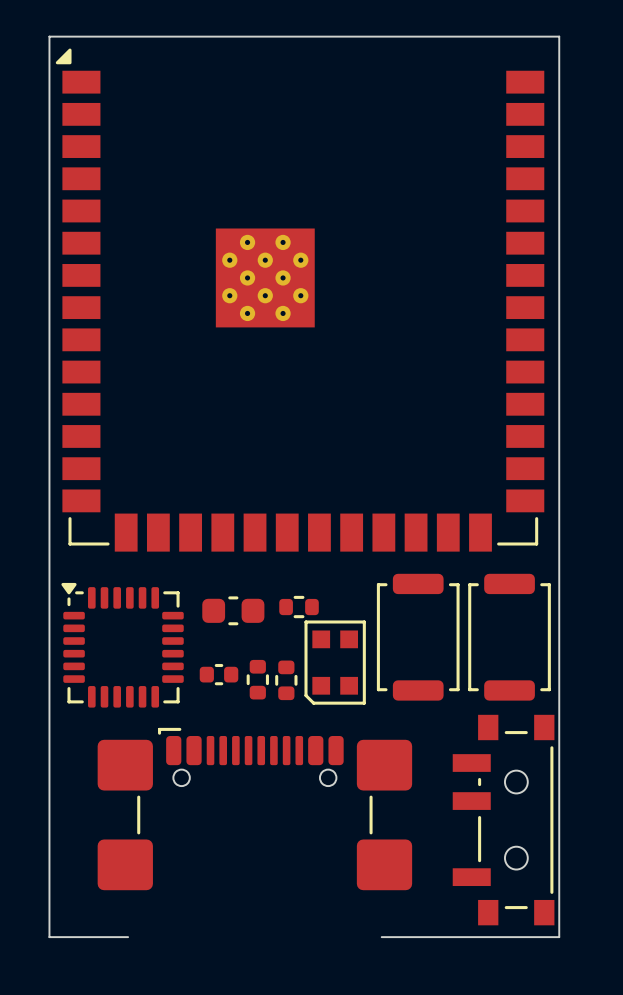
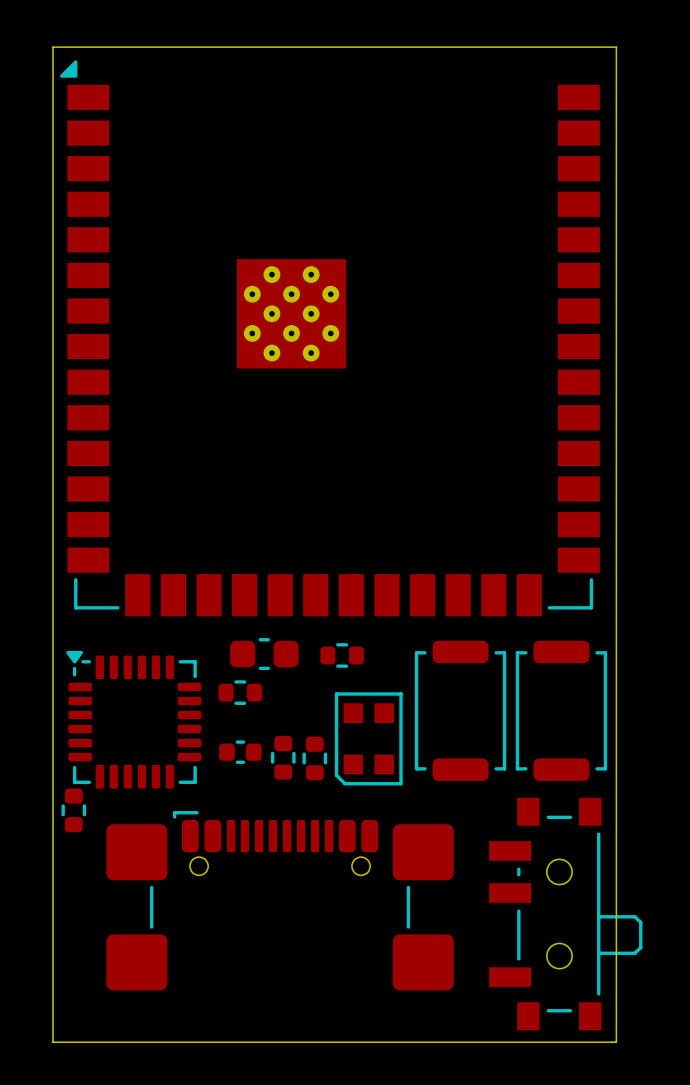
part position: (299, 607) -> (342, 655)
part position: (233, 610) -> (264, 654)
part: none -> (240, 692)
part footprint: [452, 714, 555, 926] -> [489, 797, 643, 1031]
part: none -> (73, 810)
board edge: none -> (139, 1042) (420, 1042)

